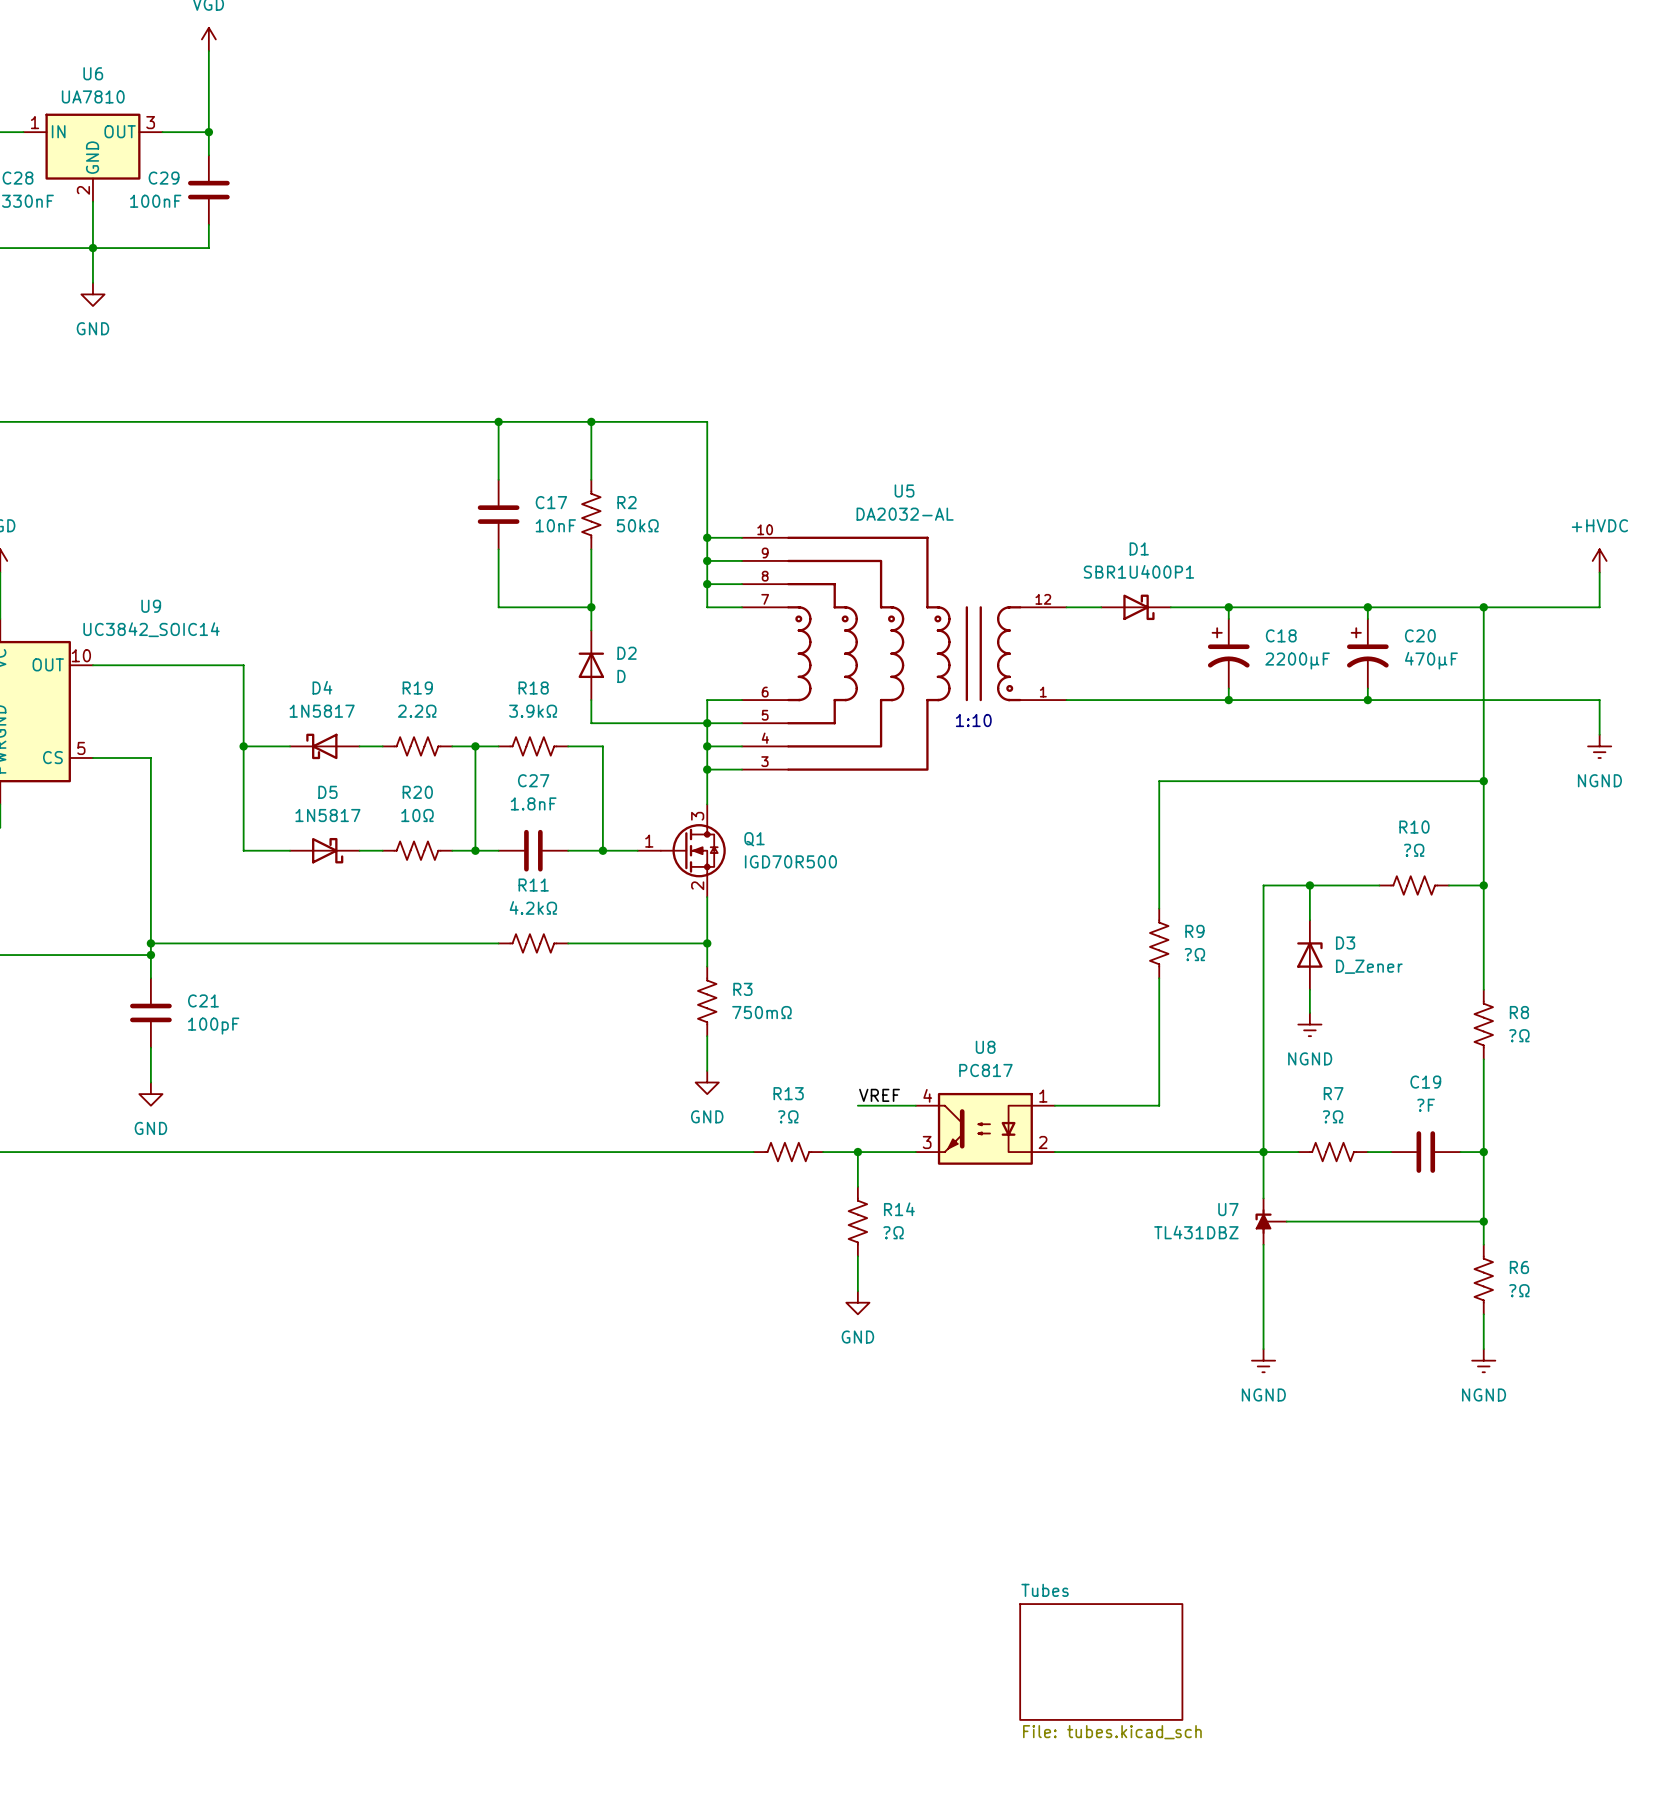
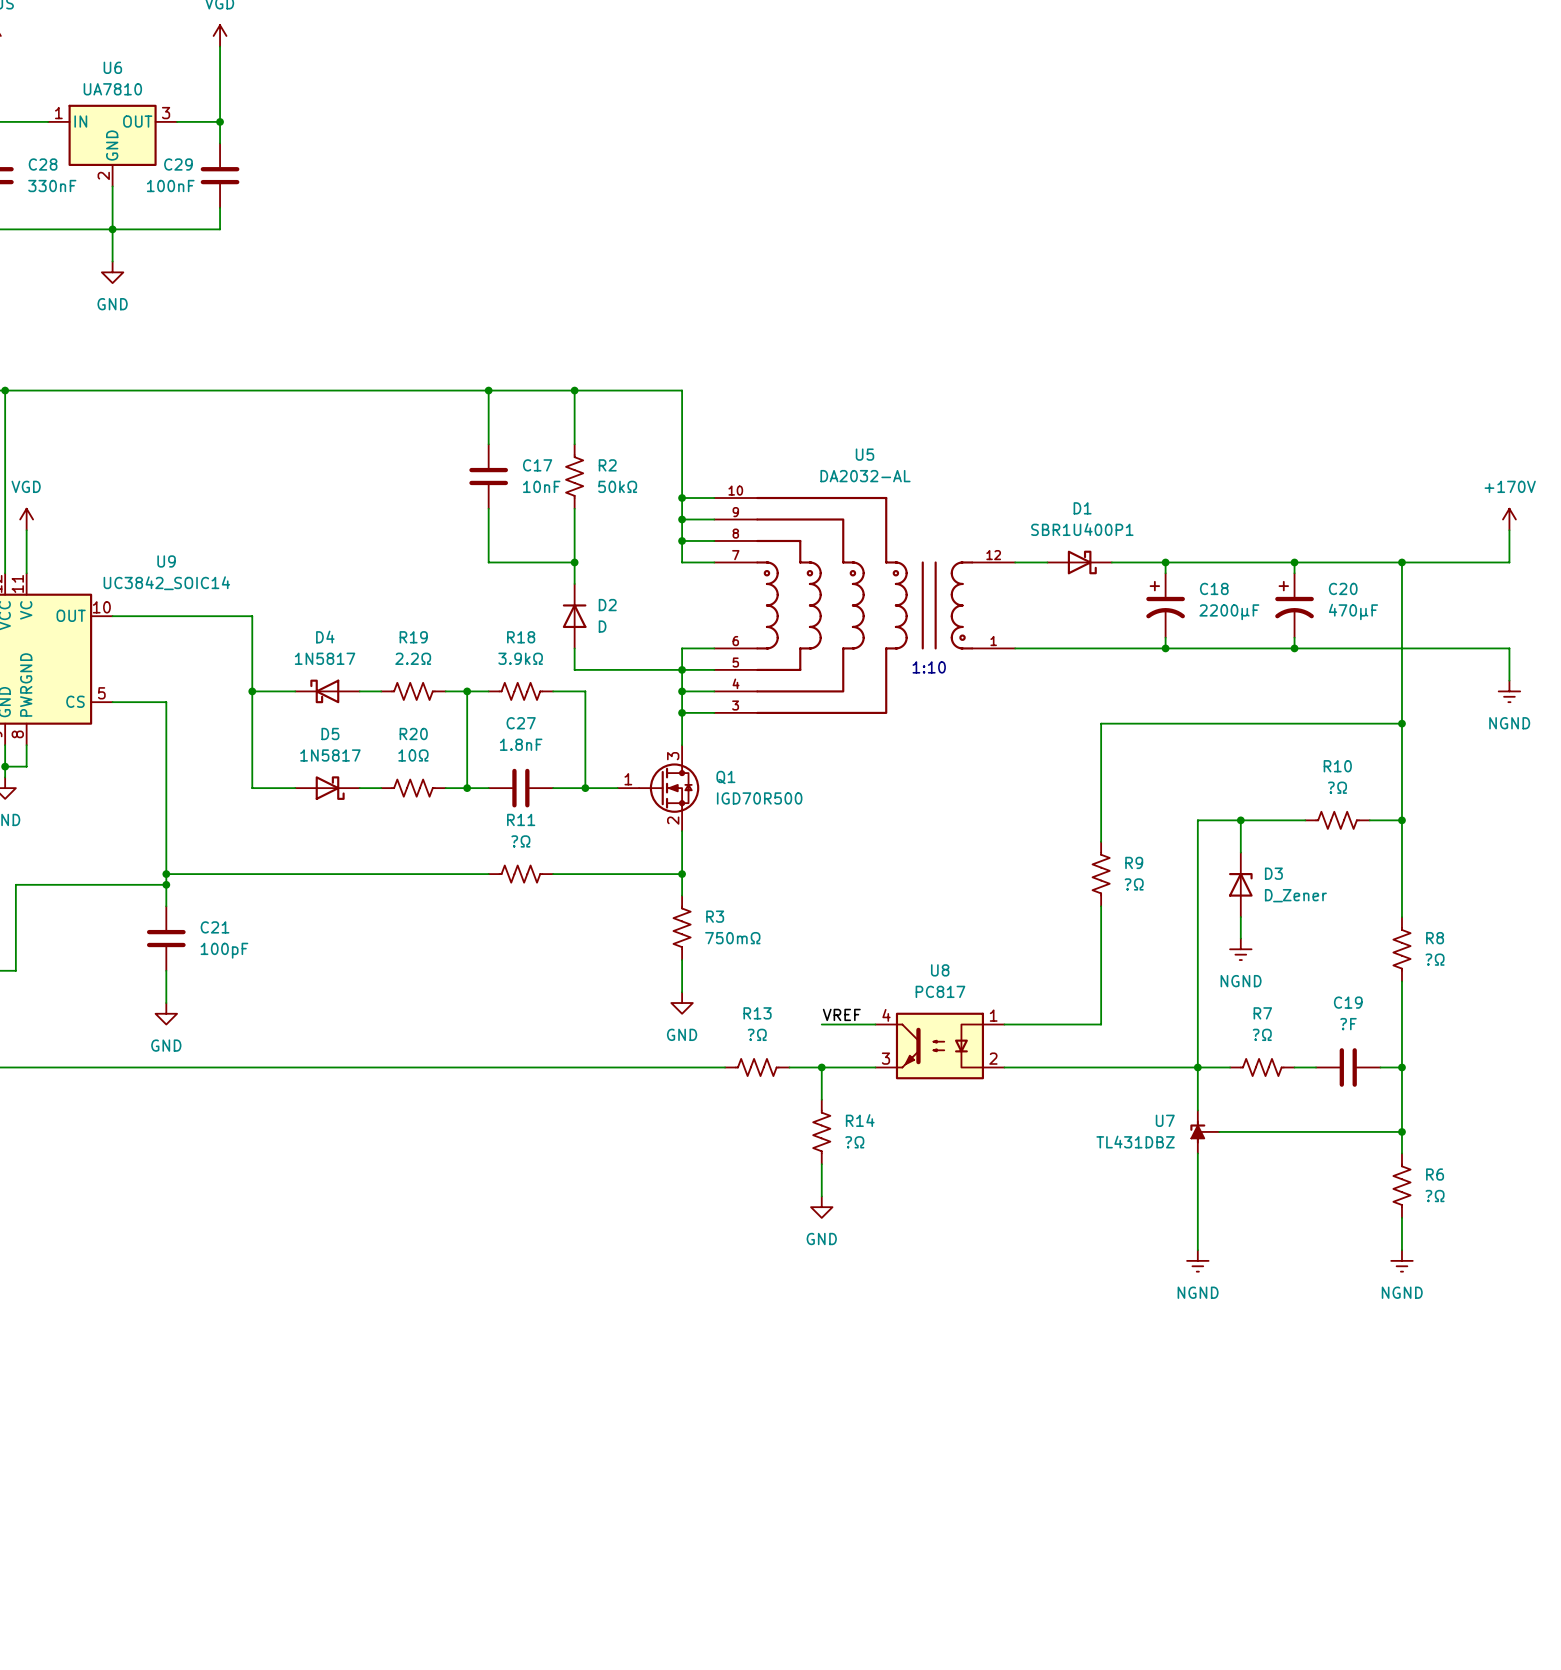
power symbol: +HVDC (1599, 560) -> +170V (1509, 519)
R11 value: 4.2kΩ (533, 907) -> ?Ω (520, 841)
sheet Tubes: File: tubes.kicad_sch (1101, 1661) -> none

